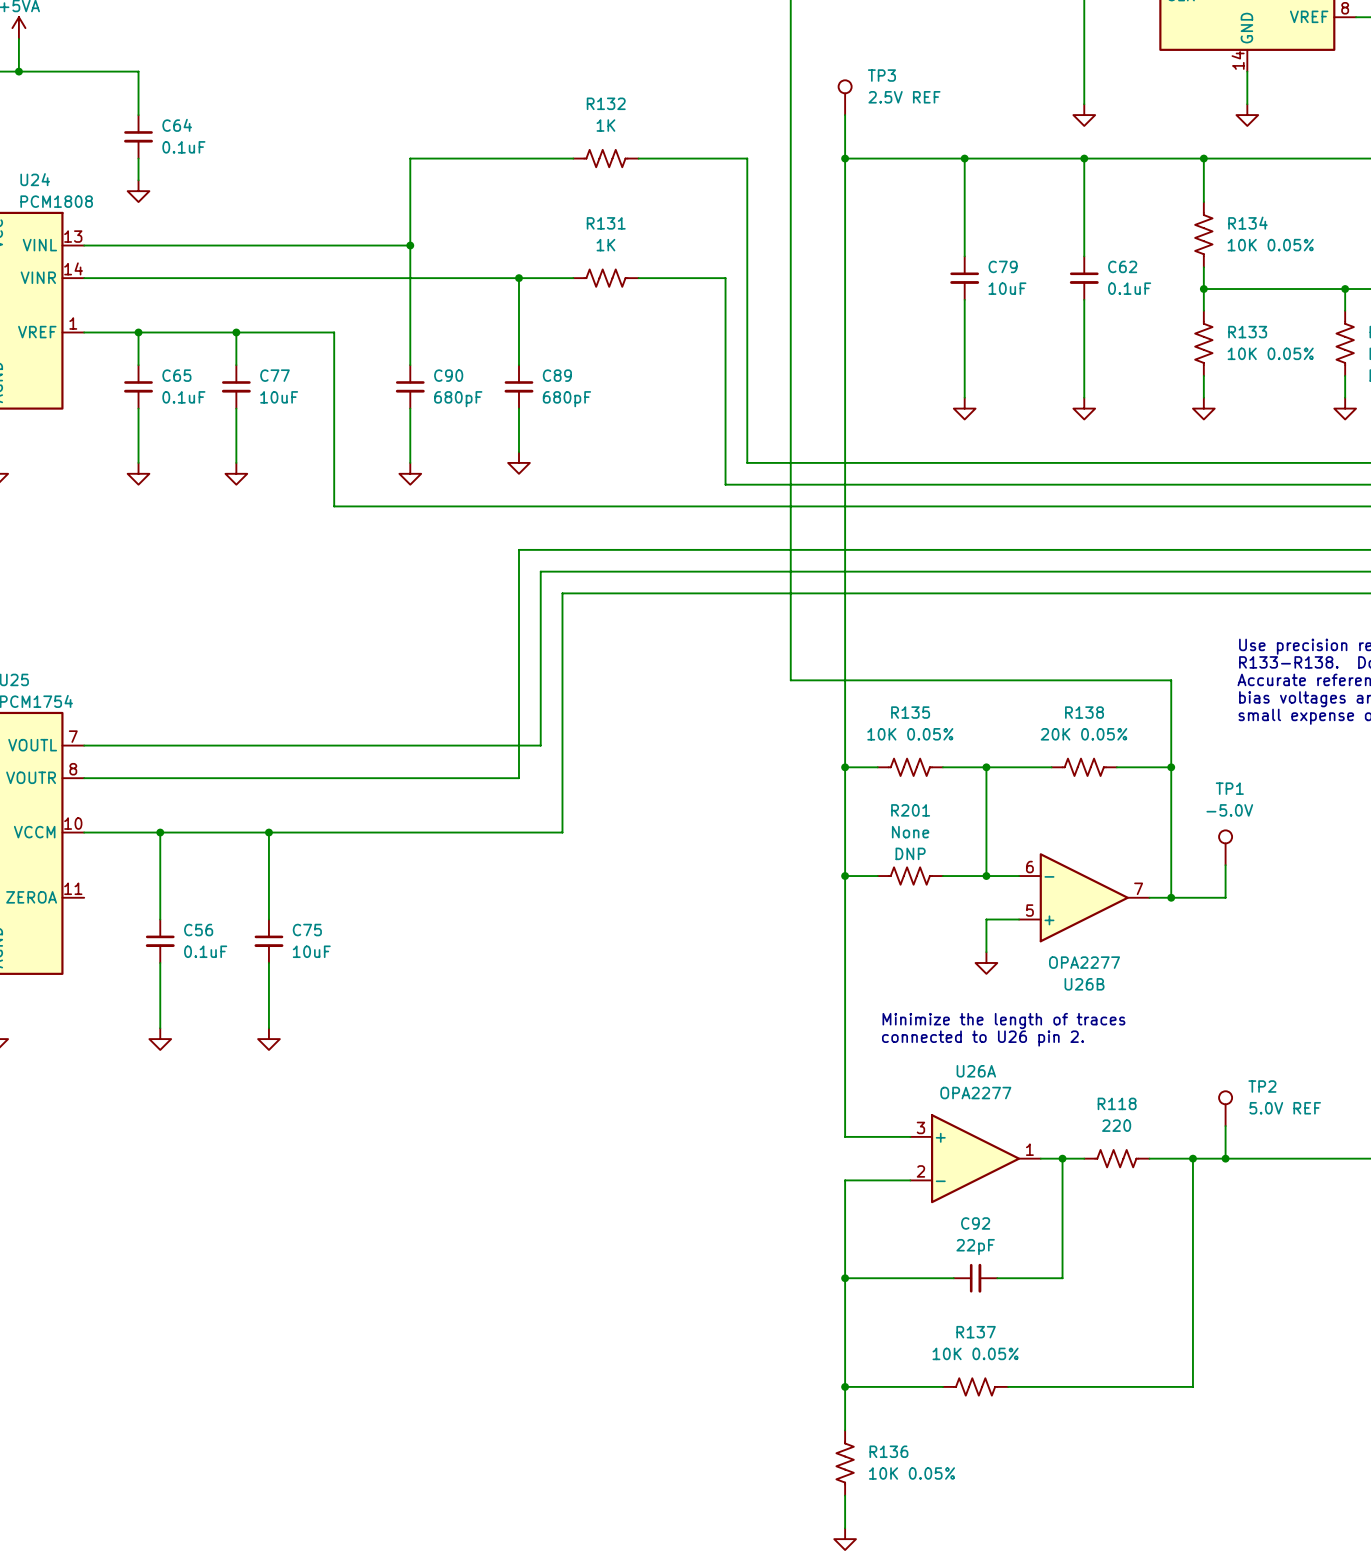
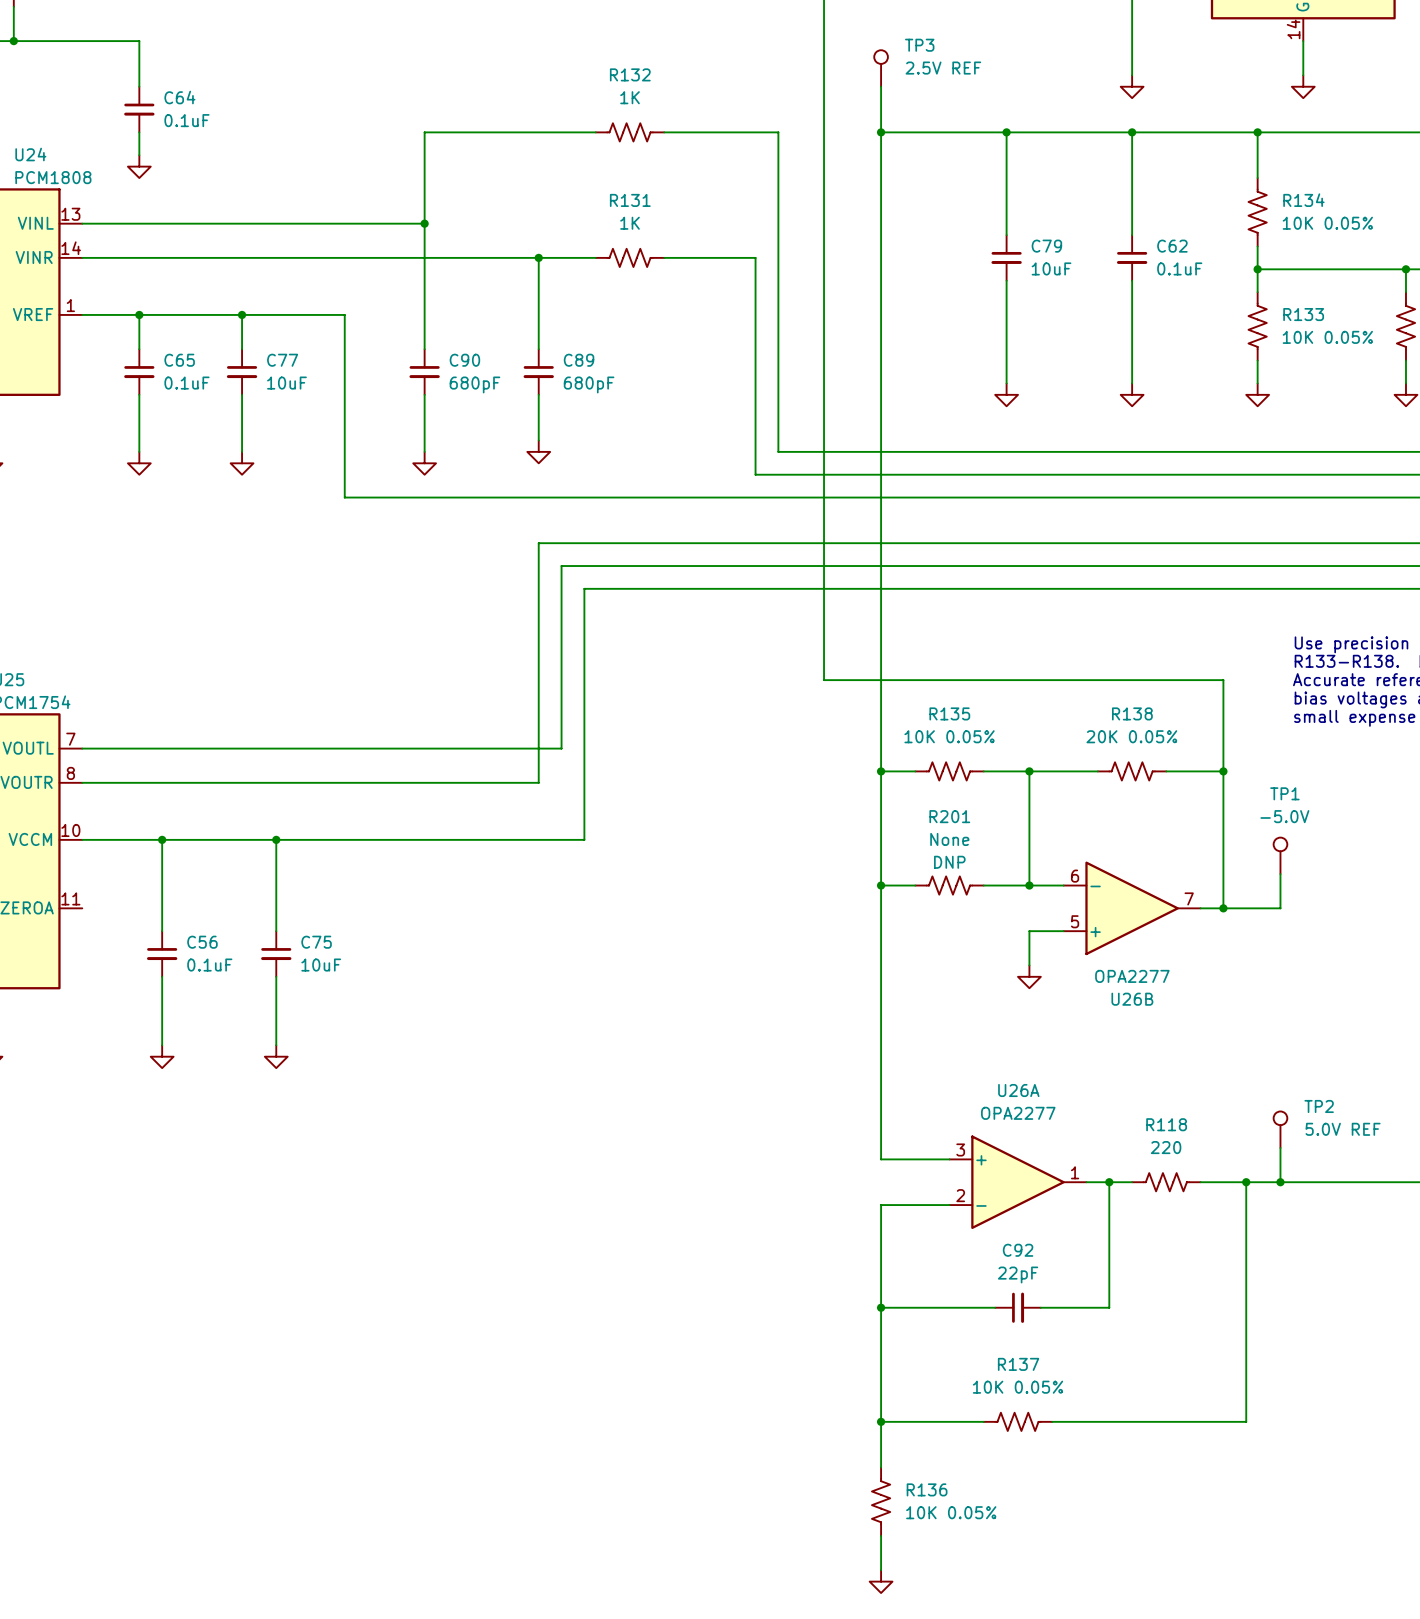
text: Minimize the length of traces (1003, 1021) -> none
text: connected to U26 pin 2. (982, 1038) -> none

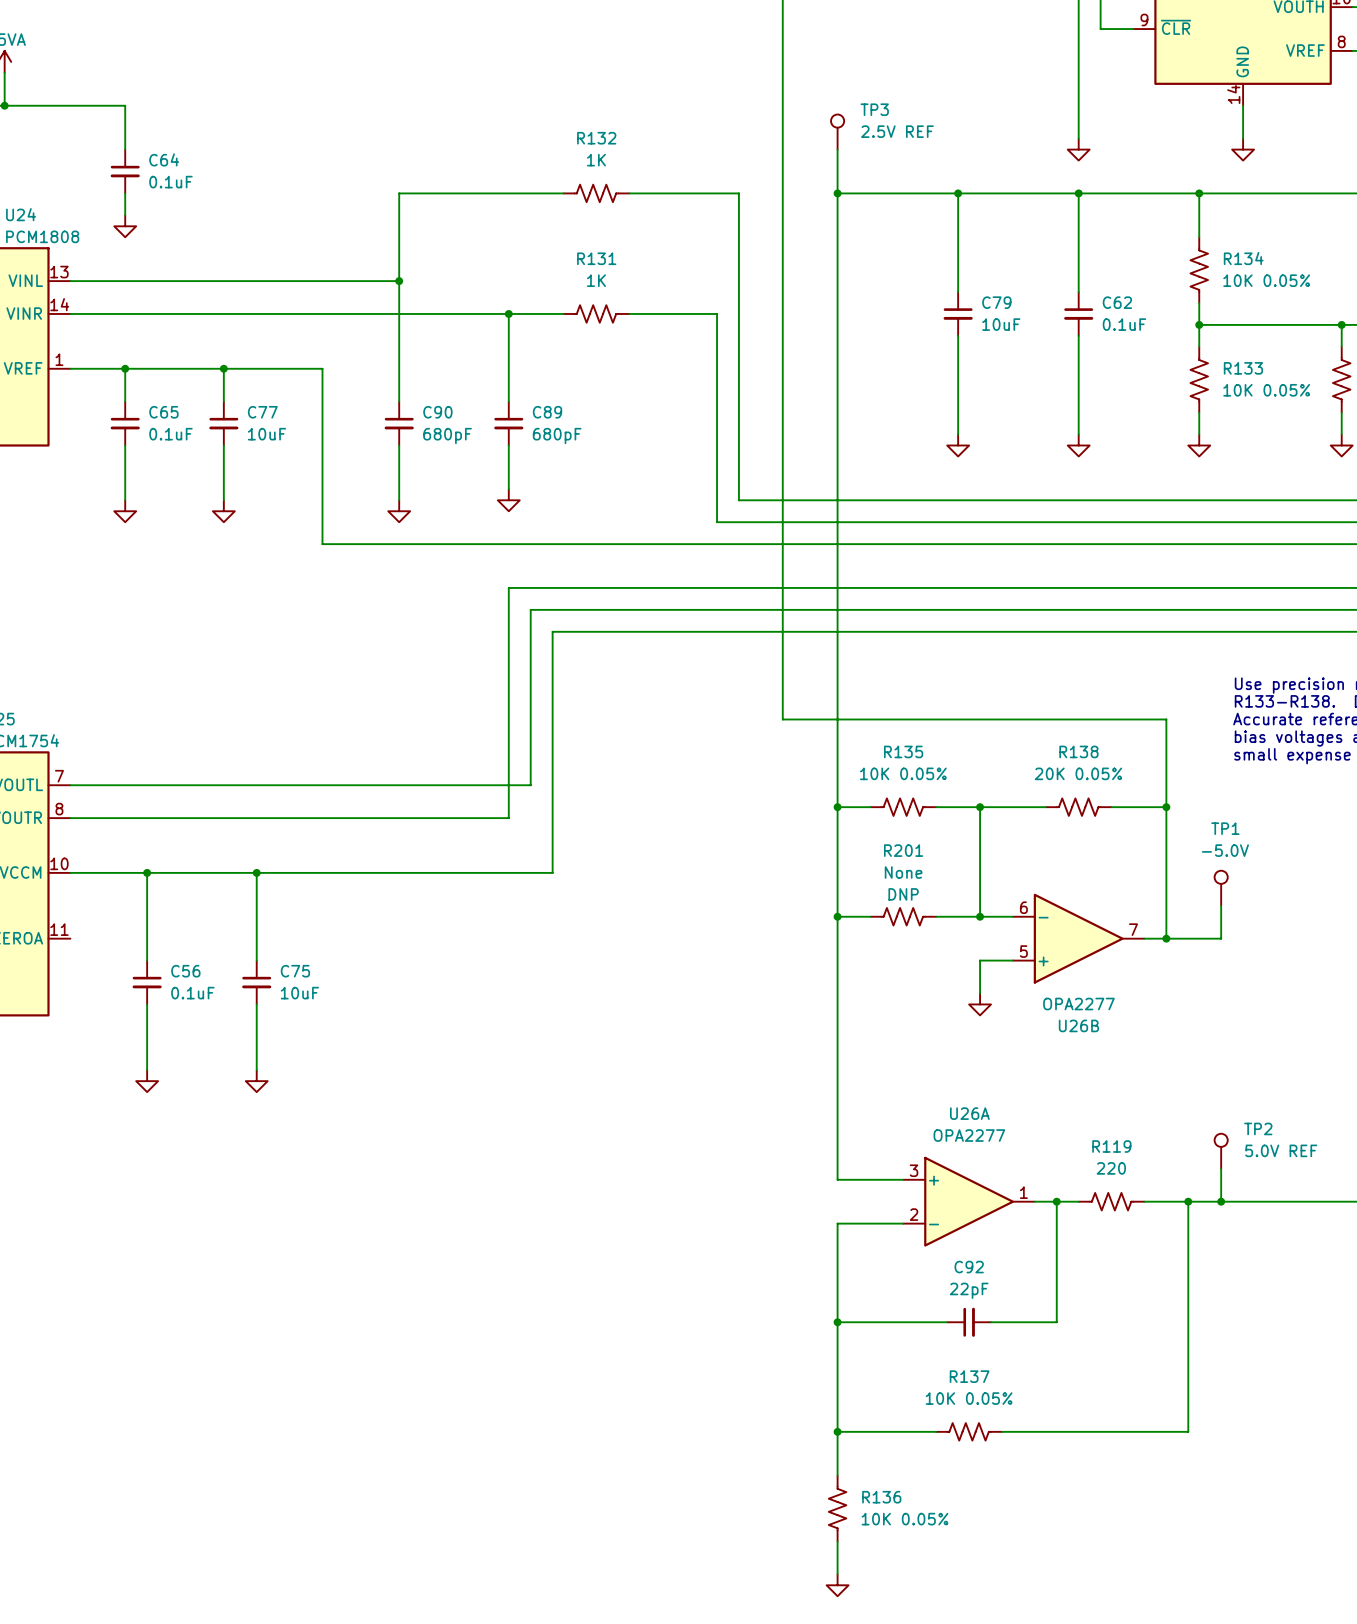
R118 name: R118 (1166, 1124) -> R119 (1111, 1146)

